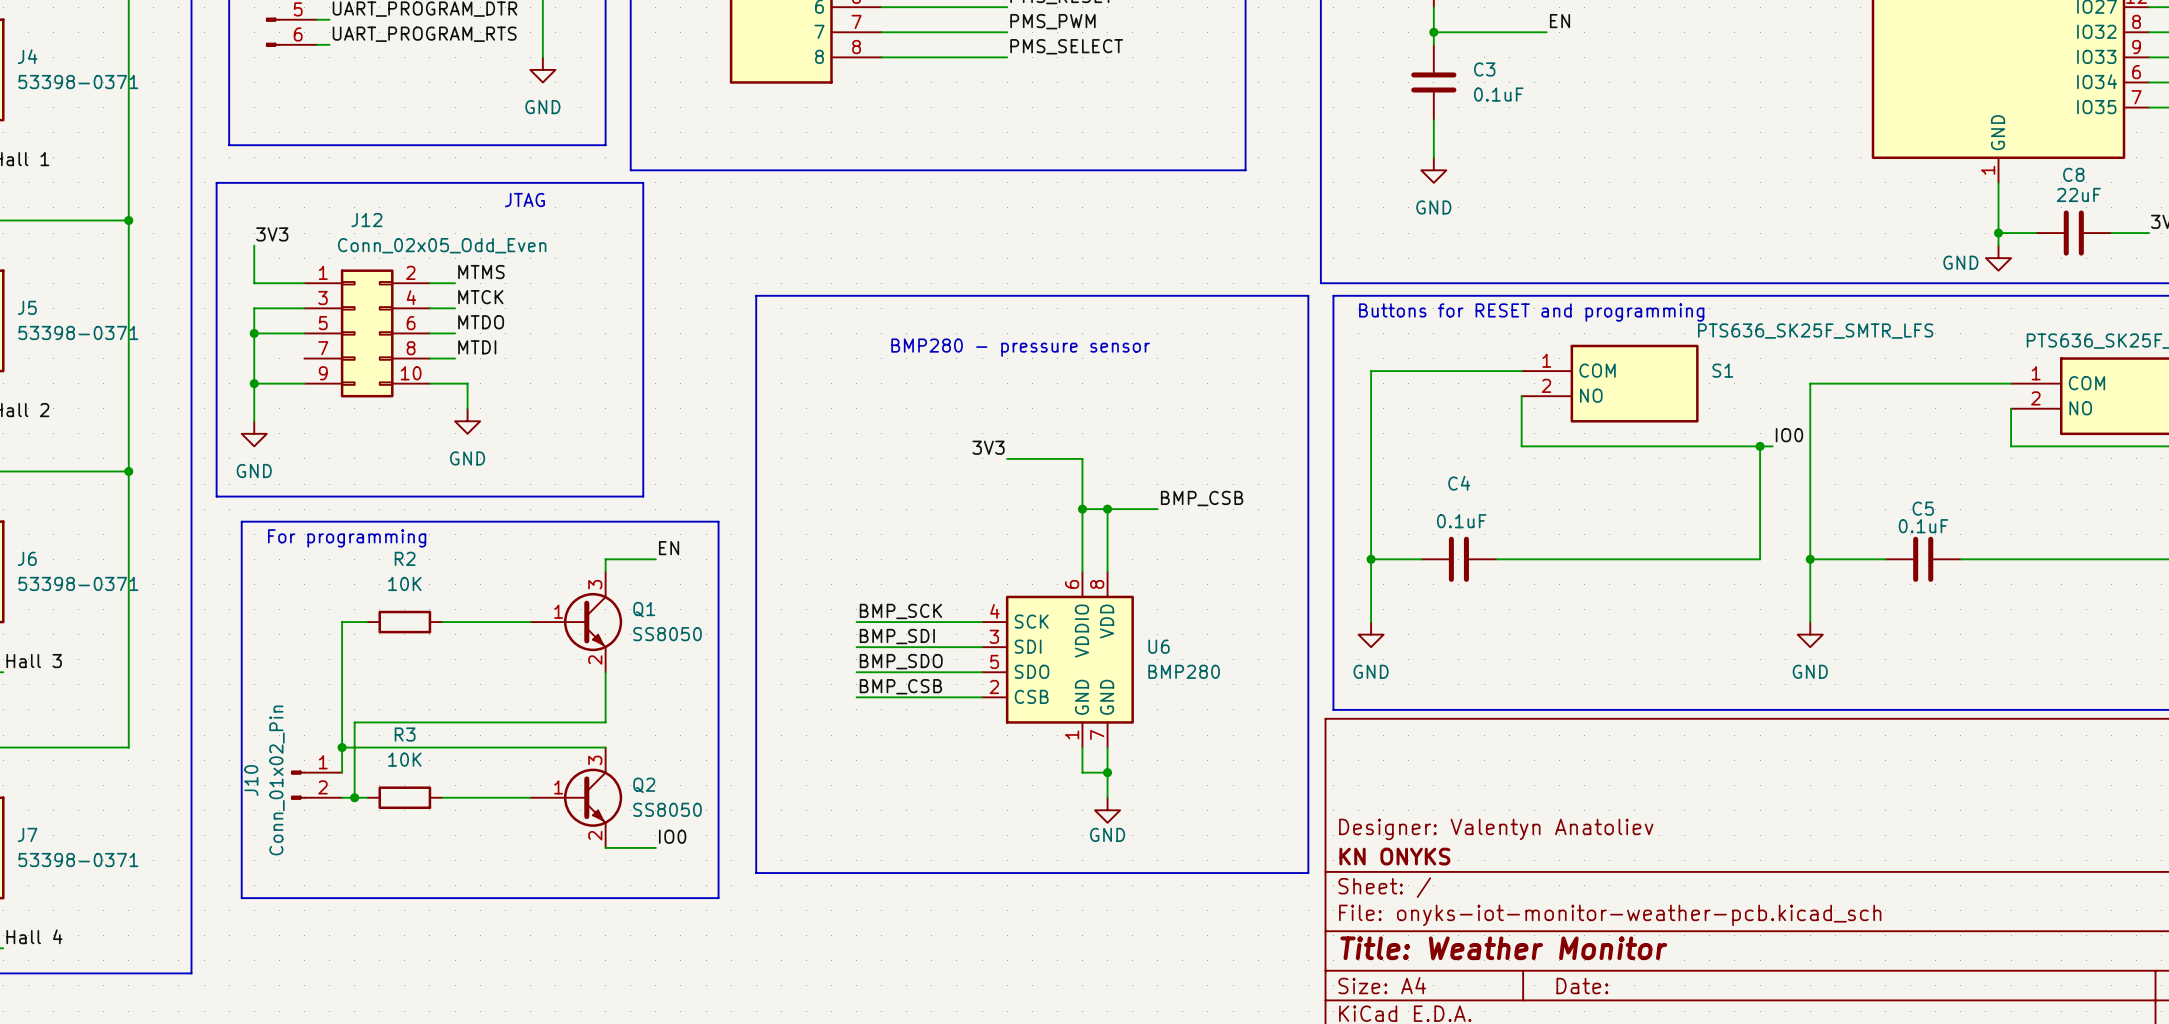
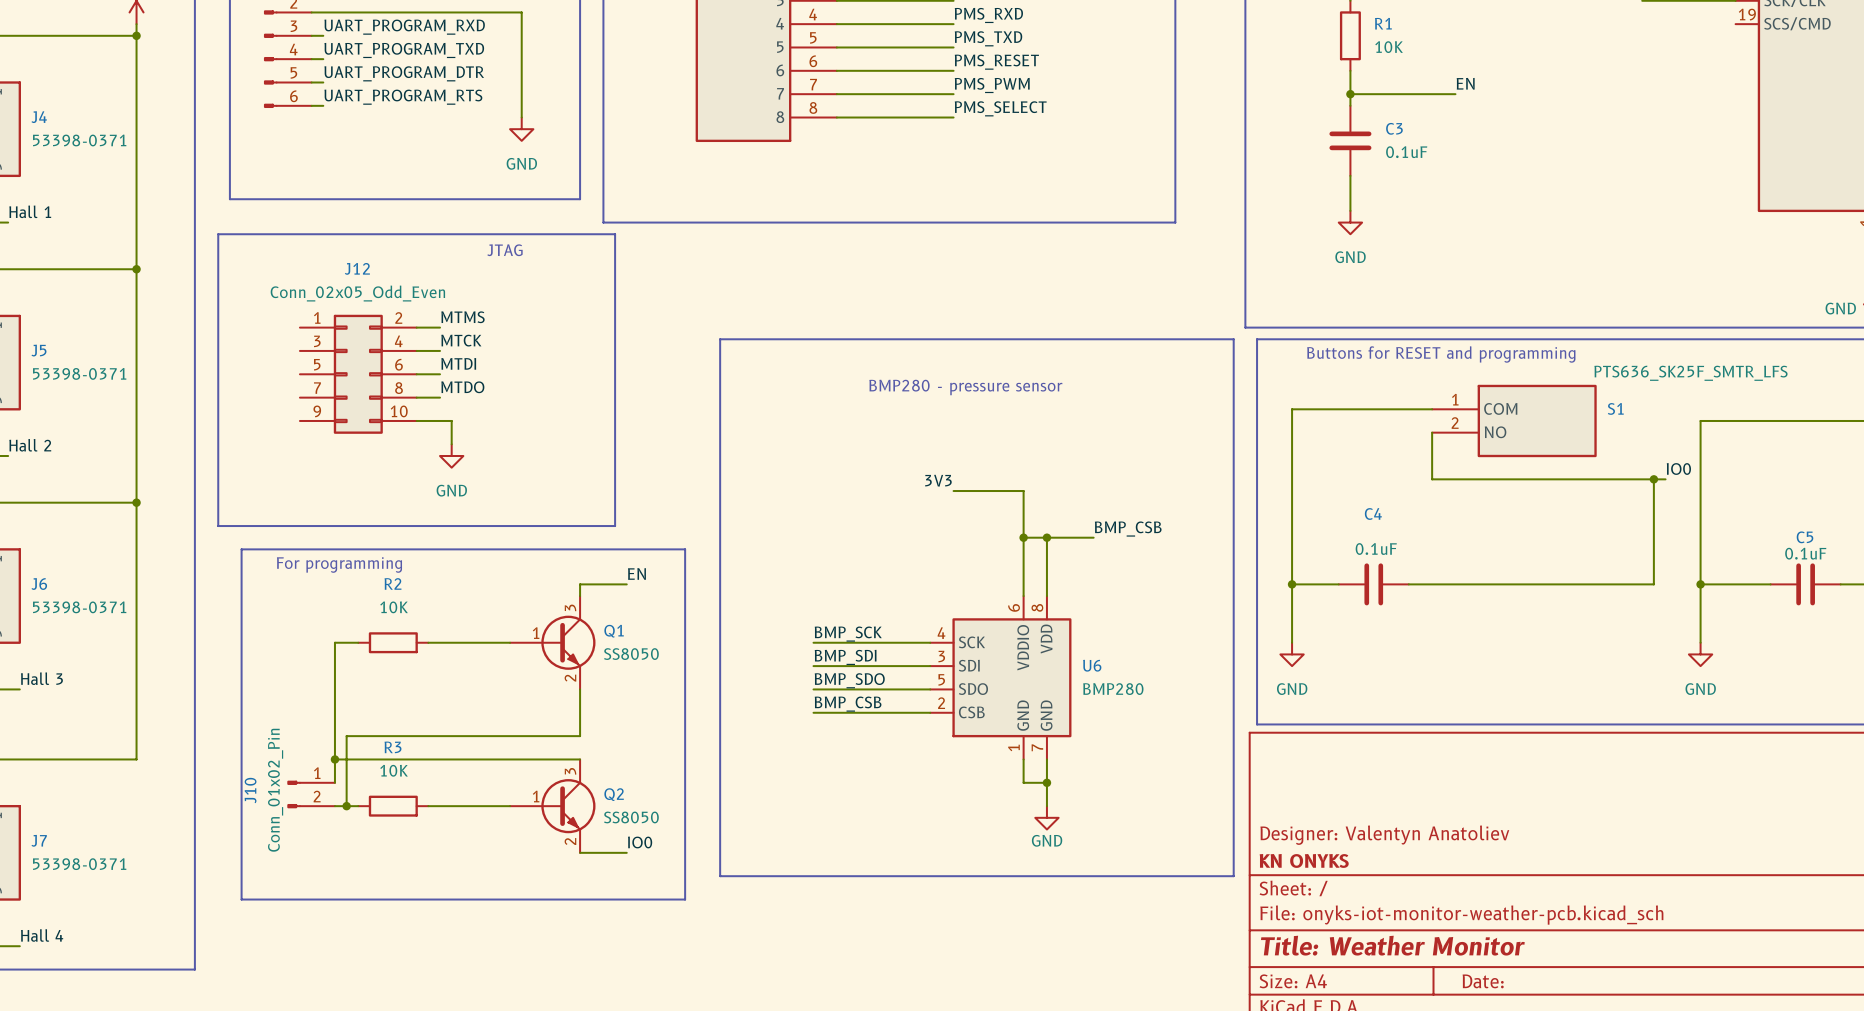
label: 3V3 (272, 234) -> none
wire: (254, 245) (254, 283) (304, 283) -> none
J12 value position: Conn_02x05_Odd_Even (442, 245) -> Conn_02x05_Odd_Even (357, 293)
wire: (304, 308) (254, 308) (254, 421) -> none
label: MTDO (481, 322) -> MTDI (458, 363)
wire: (254, 333) (304, 333) -> none
junction: (254, 333) -> none
label: MTDI (477, 347) -> MTDO (462, 387)
wire: (254, 383) (304, 383) -> none
junction: (254, 383) -> none
power symbol: GND (254, 433) -> none

